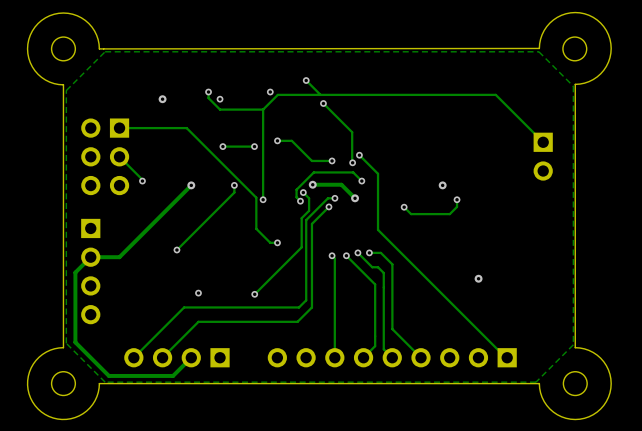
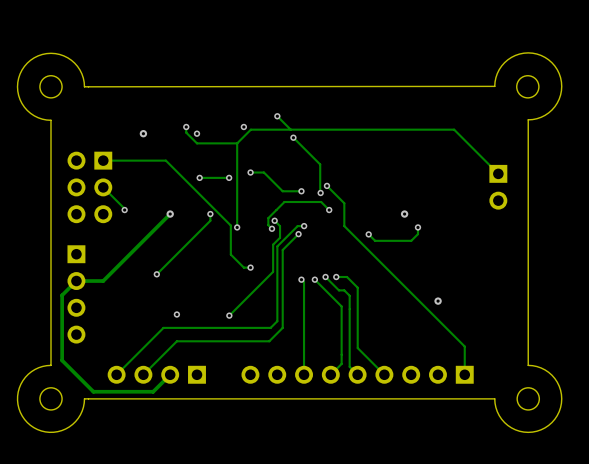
zone outline: (538, 51) (105, 51) (66, 90) (66, 343) (105, 382) (536, 382) (573, 344) (573, 86) (538, 51) -> none
track: (312, 184) (341, 184) (355, 198) -> none
via: (312, 184) -> none
via: (355, 198) -> none
track: (378, 198) (378, 229) (507, 357) -> (344, 226) (464, 346) (464, 374)

